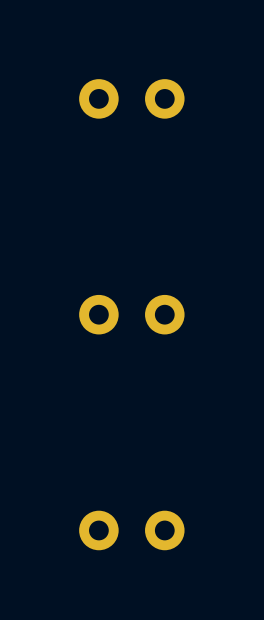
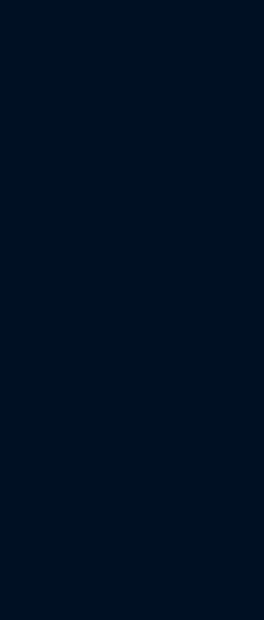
part: (131, 98) -> none
part: (131, 314) -> none
part: (131, 530) -> none

